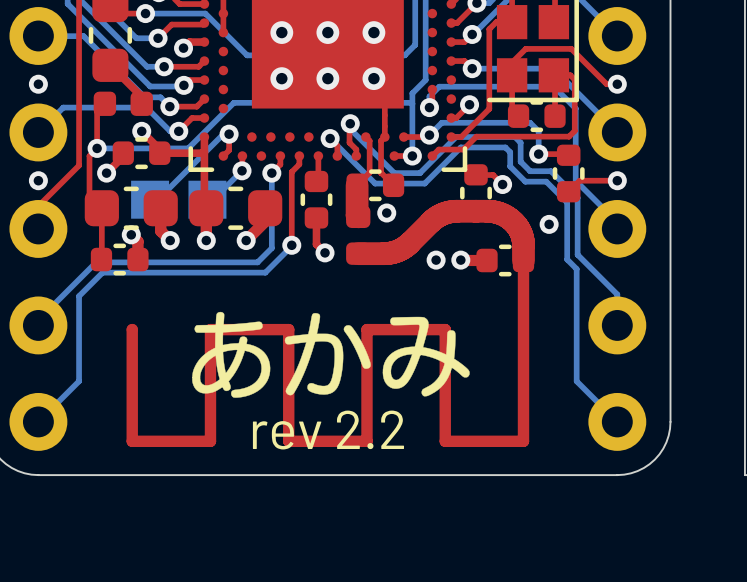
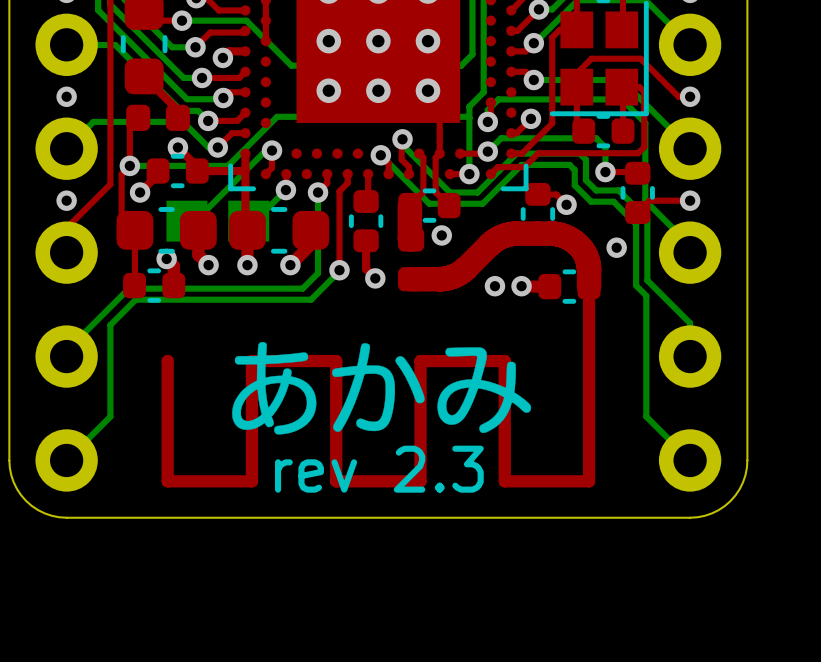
text: rev 2.2 (328, 430) -> rev 2.3 (379, 469)

